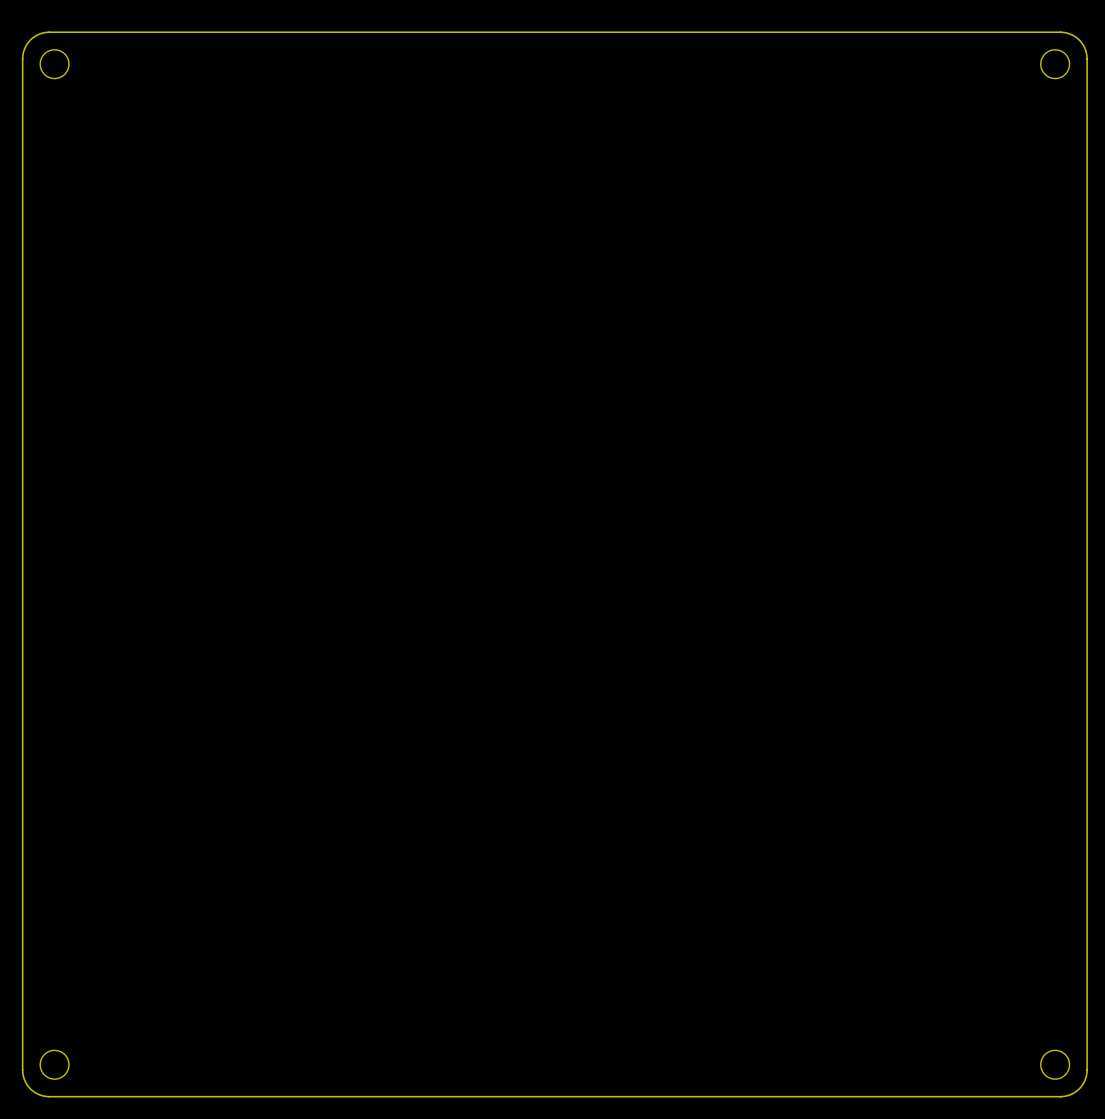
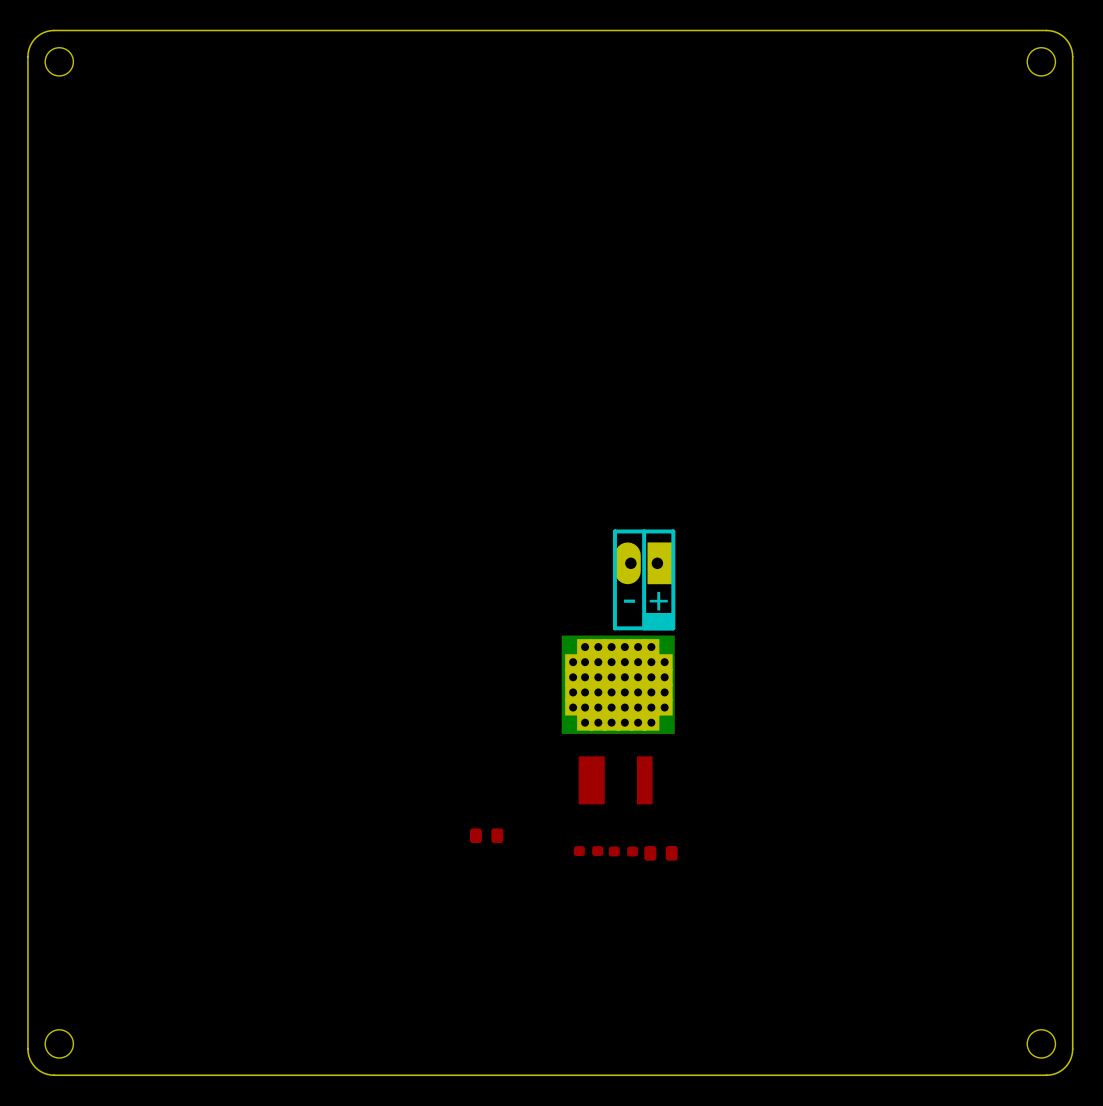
part: none -> (644, 579)
part: none -> (618, 720)
part: none -> (486, 835)
part: none -> (588, 851)
part: none -> (623, 851)
part: none -> (661, 853)

